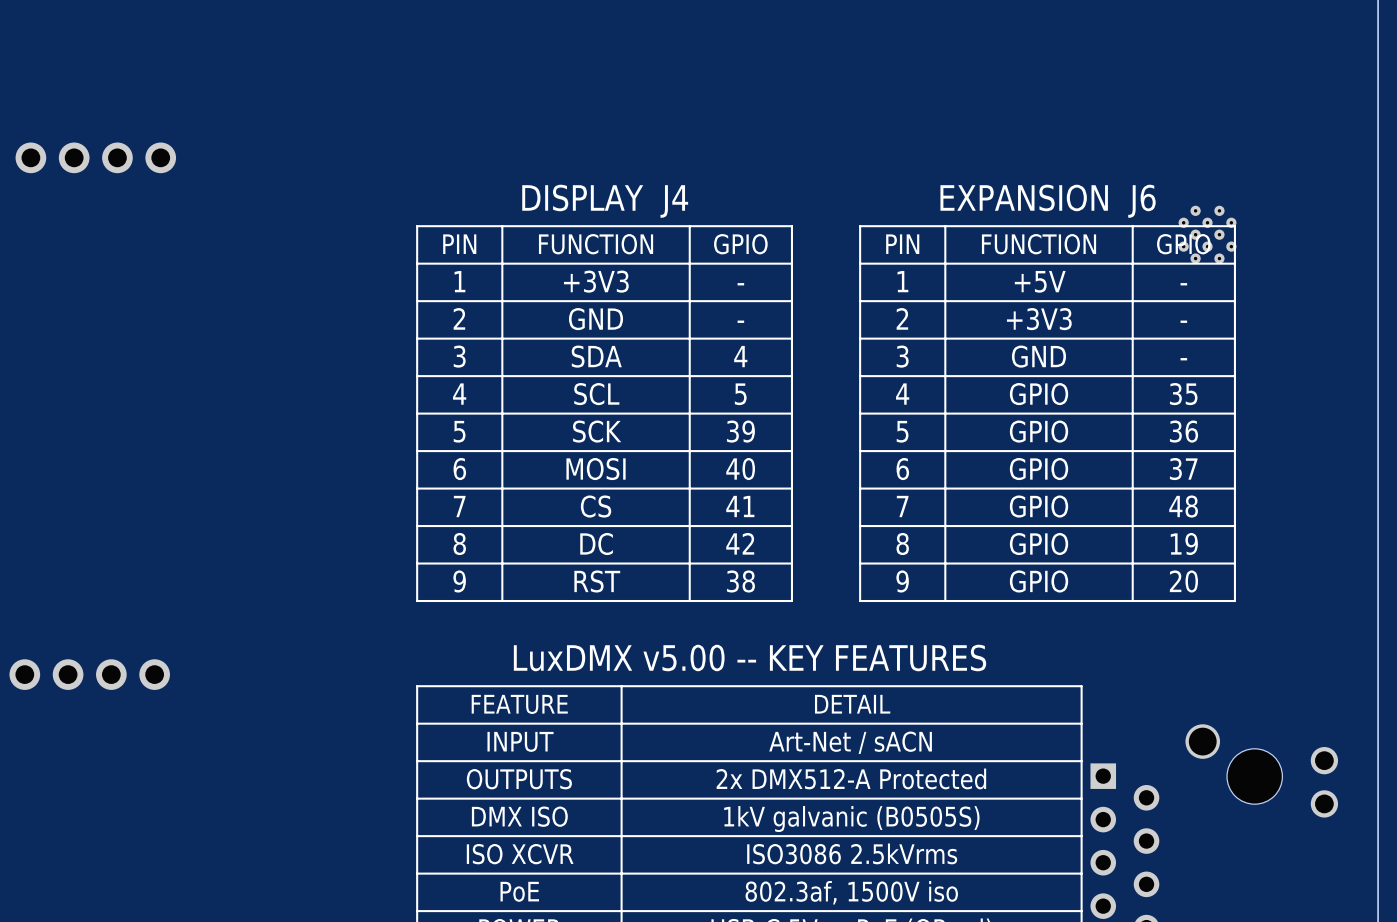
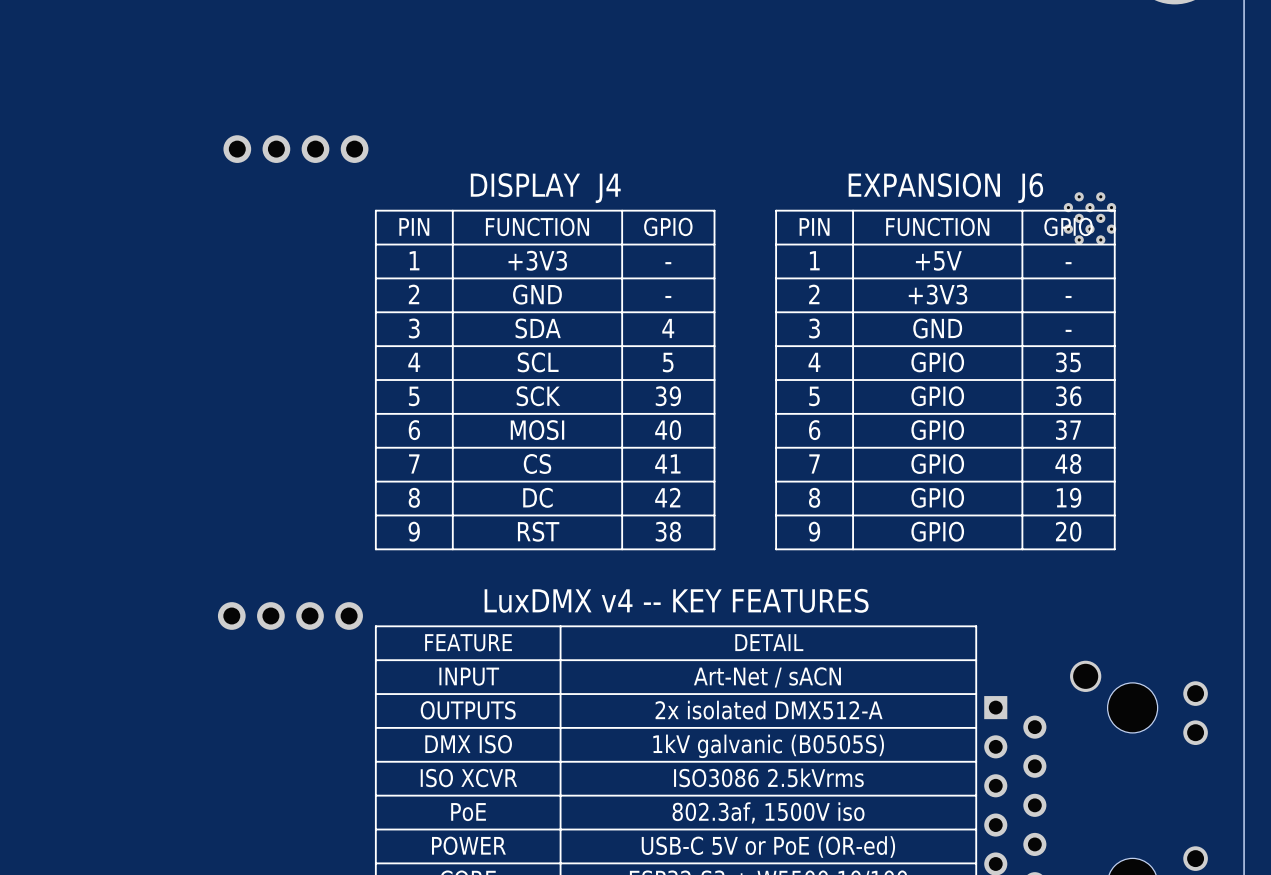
part position: (95, 157) -> (295, 149)
text: LuxDMX v5.00 -- KEY FEATURES (750, 658) -> LuxDMX v4 -- KEY FEATURES (676, 600)
part position: (89, 674) -> (290, 616)
text: 2x DMX512-A Protected (851, 778) -> 2x isolated DMX512-A (769, 710)

